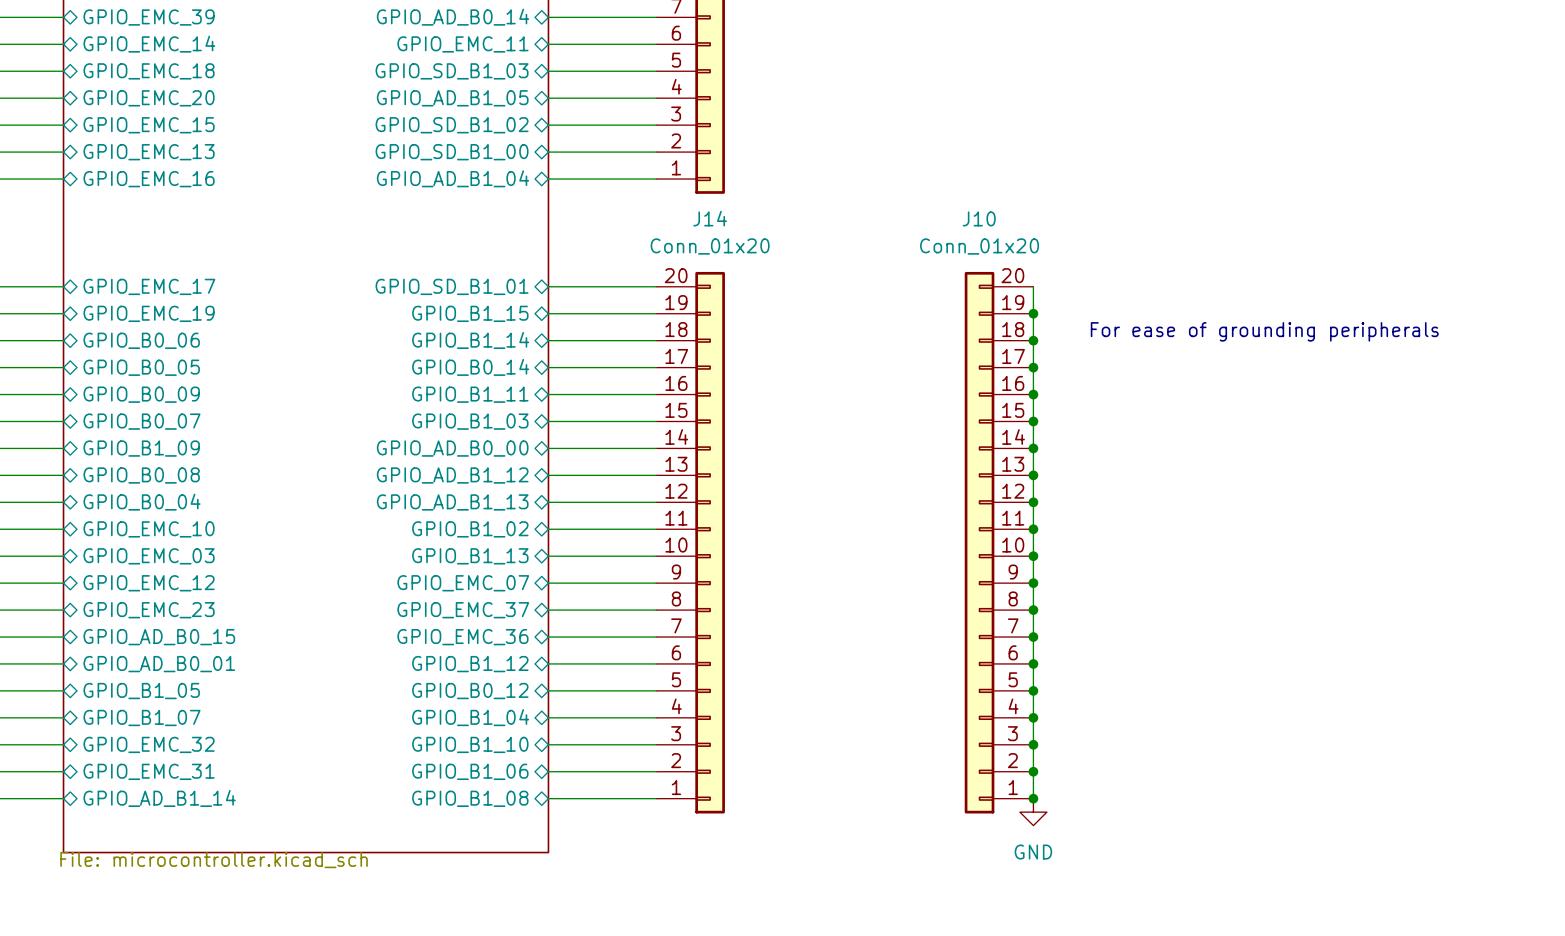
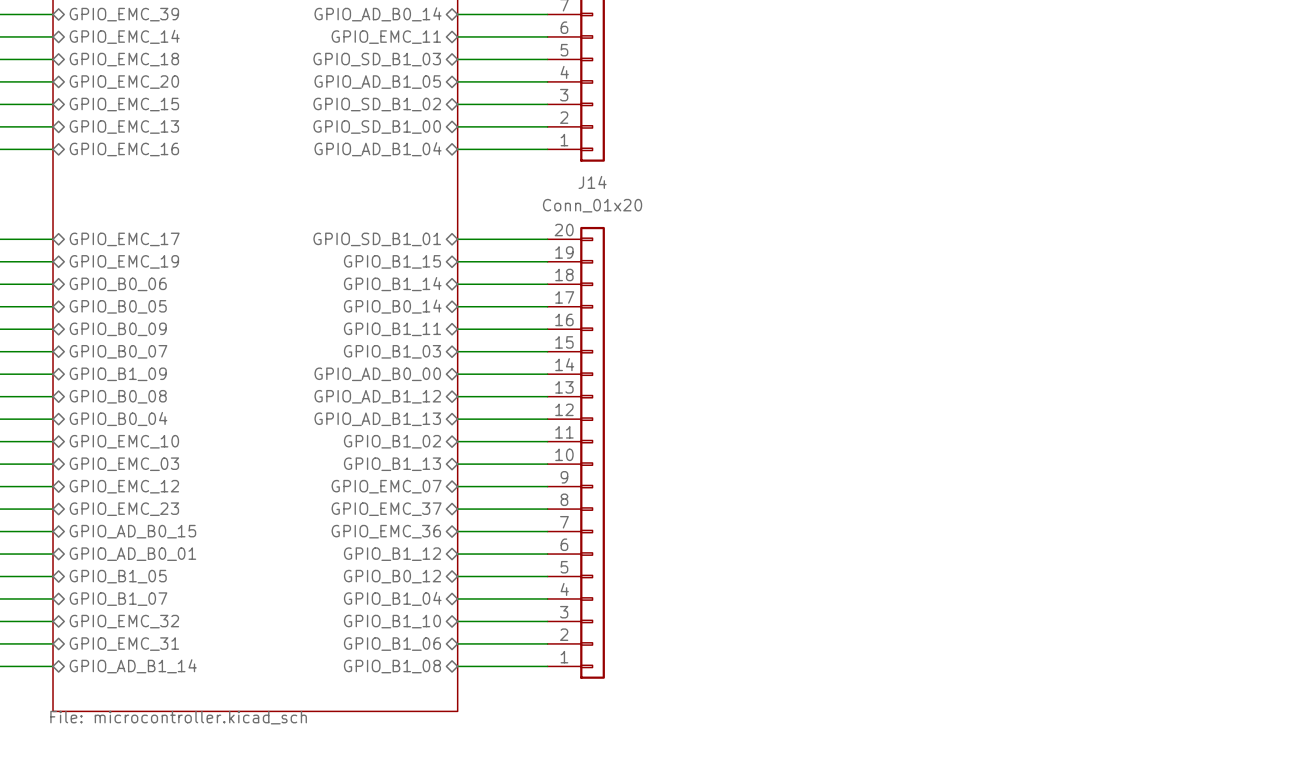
wire: (1033, 286) (1033, 798) -> none
junction: (1033, 313) -> none
text: For ease of grounding peripherals (1264, 331) -> none
junction: (1033, 340) -> none
junction: (1033, 367) -> none
junction: (1033, 394) -> none
junction: (1033, 421) -> none
junction: (1033, 448) -> none
junction: (1033, 475) -> none
junction: (1033, 502) -> none
junction: (1033, 529) -> none
J10: Conn_01x20 (999, 542) -> none
junction: (1033, 556) -> none
junction: (1033, 583) -> none
junction: (1033, 610) -> none
junction: (1033, 637) -> none
junction: (1033, 663) -> none
junction: (1033, 690) -> none
junction: (1033, 717) -> none
junction: (1033, 744) -> none
junction: (1033, 771) -> none
junction: (1033, 798) -> none
power symbol: GND (1033, 812) -> none

